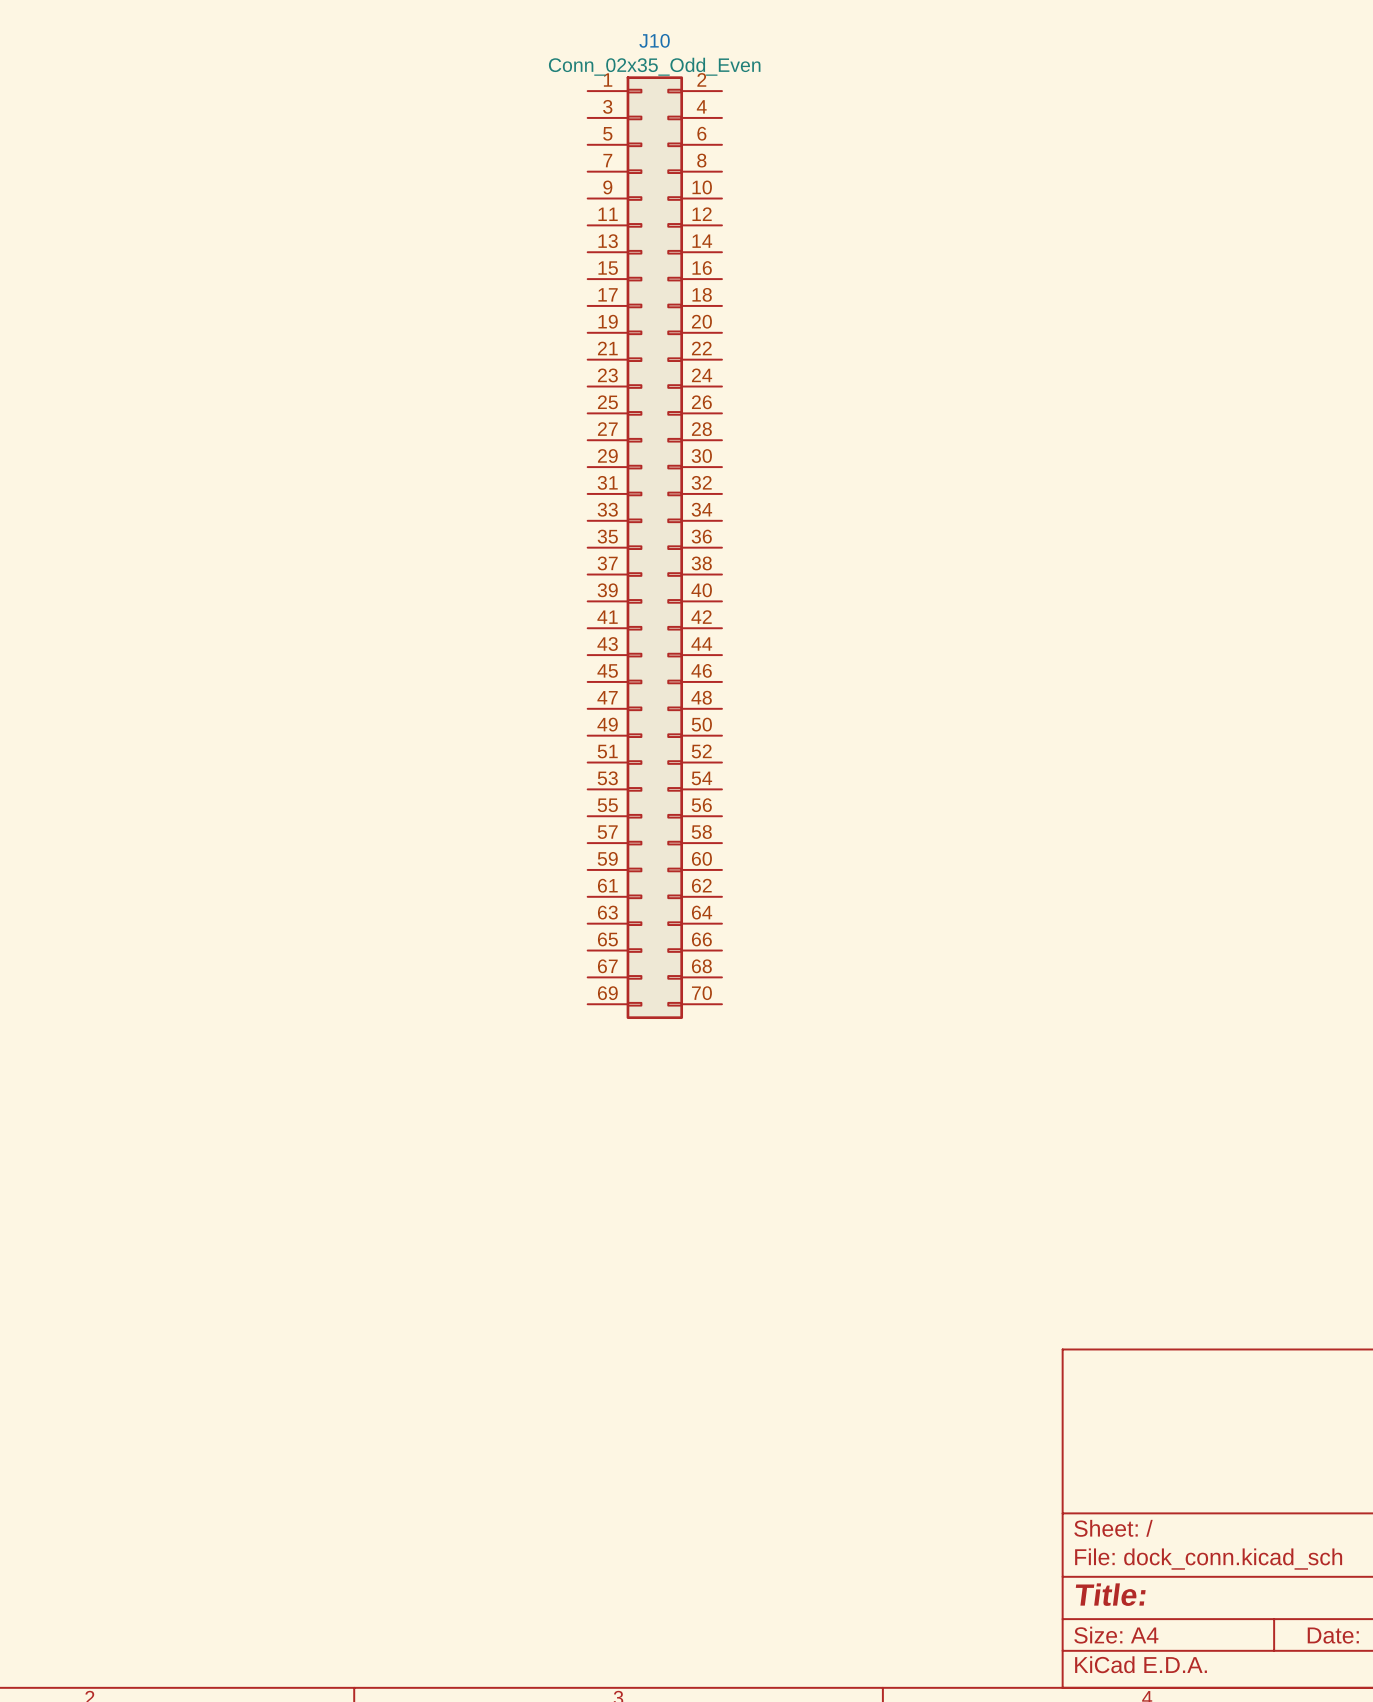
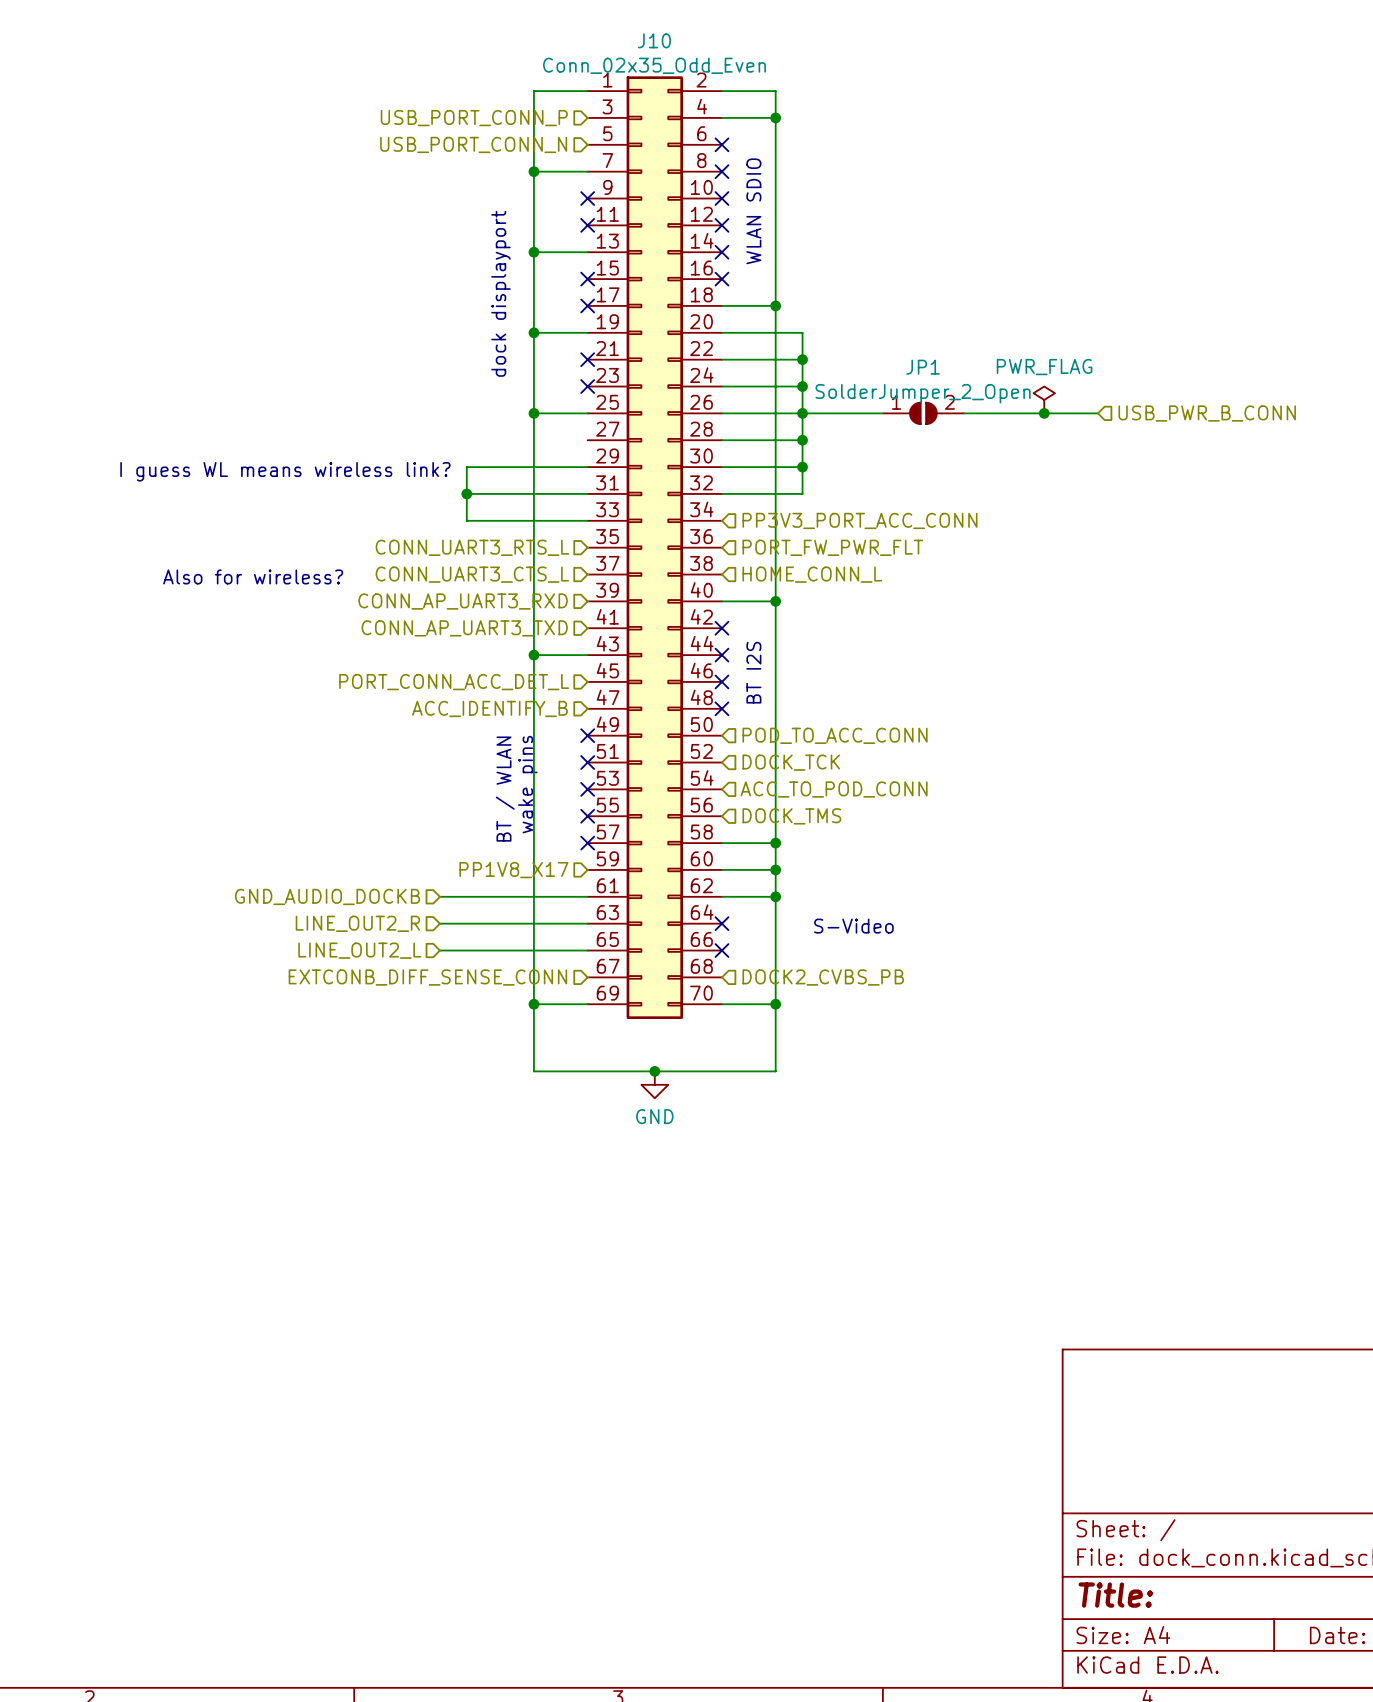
wire: none -> (587, 91) (533, 91) (533, 1071) (775, 1071) (775, 91) (721, 91)
wire: none -> (721, 117) (775, 117)
junction: none -> (775, 117)
hierarchical label: none -> USB_PORT_CONN_P (474, 118)
no-connect mark: none -> (721, 144)
hierarchical label: none -> USB_PORT_CONN_N (473, 144)
wire: none -> (533, 171) (587, 171)
junction: none -> (533, 171)
no-connect mark: none -> (721, 171)
no-connect mark: none -> (587, 198)
no-connect mark: none -> (721, 198)
text: none -> WLAN SDIO (753, 211)
no-connect mark: none -> (587, 225)
no-connect mark: none -> (721, 225)
wire: none -> (533, 252) (587, 252)
junction: none -> (533, 252)
no-connect mark: none -> (721, 252)
text: none -> dock displayport (500, 293)
no-connect mark: none -> (587, 279)
no-connect mark: none -> (721, 279)
no-connect mark: none -> (587, 305)
wire: none -> (721, 305) (775, 305)
junction: none -> (775, 305)
wire: none -> (533, 332) (587, 332)
junction: none -> (533, 332)
wire: none -> (721, 332) (802, 332) (802, 493) (721, 493)
no-connect mark: none -> (587, 359)
wire: none -> (721, 359) (802, 359)
junction: none -> (802, 359)
no-connect mark: none -> (587, 386)
wire: none -> (721, 386) (802, 386)
junction: none -> (802, 386)
power symbol: none -> PWR_FLAG (1044, 399)
wire: none -> (533, 413) (587, 413)
junction: none -> (533, 413)
wire: none -> (721, 413) (883, 413)
junction: none -> (802, 413)
JP1: none -> SolderJumper_2_Open (923, 413)
wire: none -> (963, 413) (1097, 413)
junction: none -> (1044, 413)
hierarchical label: none -> USB_PWR_B_CONN (1207, 413)
wire: none -> (721, 440) (802, 440)
junction: none -> (802, 440)
wire: none -> (587, 467) (466, 467) (466, 520) (587, 520)
wire: none -> (721, 467) (802, 467)
junction: none -> (802, 467)
text: none -> I guess WL means wireless link? (285, 471)
wire: none -> (466, 493) (587, 493)
junction: none -> (466, 493)
hierarchical label: none -> PP3V3_PORT_ACC_CONN (859, 520)
hierarchical label: none -> CONN_UART3_RTS_L (472, 547)
hierarchical label: none -> PORT_FW_PWR_FLT (832, 547)
hierarchical label: none -> CONN_UART3_CTS_L (472, 574)
hierarchical label: none -> HOME_CONN_L (812, 574)
text: none -> Also for wireless? (253, 576)
wire: none -> (721, 601) (775, 601)
junction: none -> (775, 601)
hierarchical label: none -> CONN_AP_UART3_RXD (463, 601)
no-connect mark: none -> (721, 628)
hierarchical label: none -> CONN_AP_UART3_TXD (464, 628)
wire: none -> (533, 655) (587, 655)
junction: none -> (533, 655)
no-connect mark: none -> (721, 655)
text: none -> BT I2S (753, 672)
no-connect mark: none -> (721, 681)
hierarchical label: none -> PORT_CONN_ACC_DET_L (454, 682)
no-connect mark: none -> (721, 708)
hierarchical label: none -> ACC_IDENTIFY_B (489, 708)
no-connect mark: none -> (587, 735)
hierarchical label: none -> POD_TO_ACC_CONN (835, 735)
no-connect mark: none -> (587, 762)
hierarchical label: none -> DOCK_TCK (791, 762)
text: none -> wake pins (527, 784)
text: none -> BT / WLAN (505, 789)
no-connect mark: none -> (587, 789)
hierarchical label: none -> ACC_TO_POD_CONN (834, 789)
no-connect mark: none -> (587, 816)
hierarchical label: none -> DOCK_TMS (791, 816)
no-connect mark: none -> (587, 843)
wire: none -> (721, 843) (775, 843)
junction: none -> (775, 843)
wire: none -> (721, 869) (775, 869)
junction: none -> (775, 869)
hierarchical label: none -> PP1V8_X17 (513, 870)
wire: none -> (439, 896) (587, 896)
wire: none -> (721, 896) (775, 896)
junction: none -> (775, 896)
hierarchical label: none -> GND_AUDIO_DOCKB (327, 896)
wire: none -> (439, 923) (587, 923)
no-connect mark: none -> (721, 923)
hierarchical label: none -> LINE_OUT2_R (357, 923)
text: none -> S-Video (853, 926)
wire: none -> (439, 950) (587, 950)
no-connect mark: none -> (721, 950)
hierarchical label: none -> LINE_OUT2_L (359, 950)
hierarchical label: none -> EXTCONB_DIFF_SENSE_CONN (427, 977)
hierarchical label: none -> DOCK2_CVBS_PB (823, 977)
wire: none -> (533, 1004) (587, 1004)
junction: none -> (533, 1004)
wire: none -> (721, 1004) (775, 1004)
junction: none -> (775, 1004)
junction: none -> (654, 1071)
power symbol: none -> GND (654, 1084)

